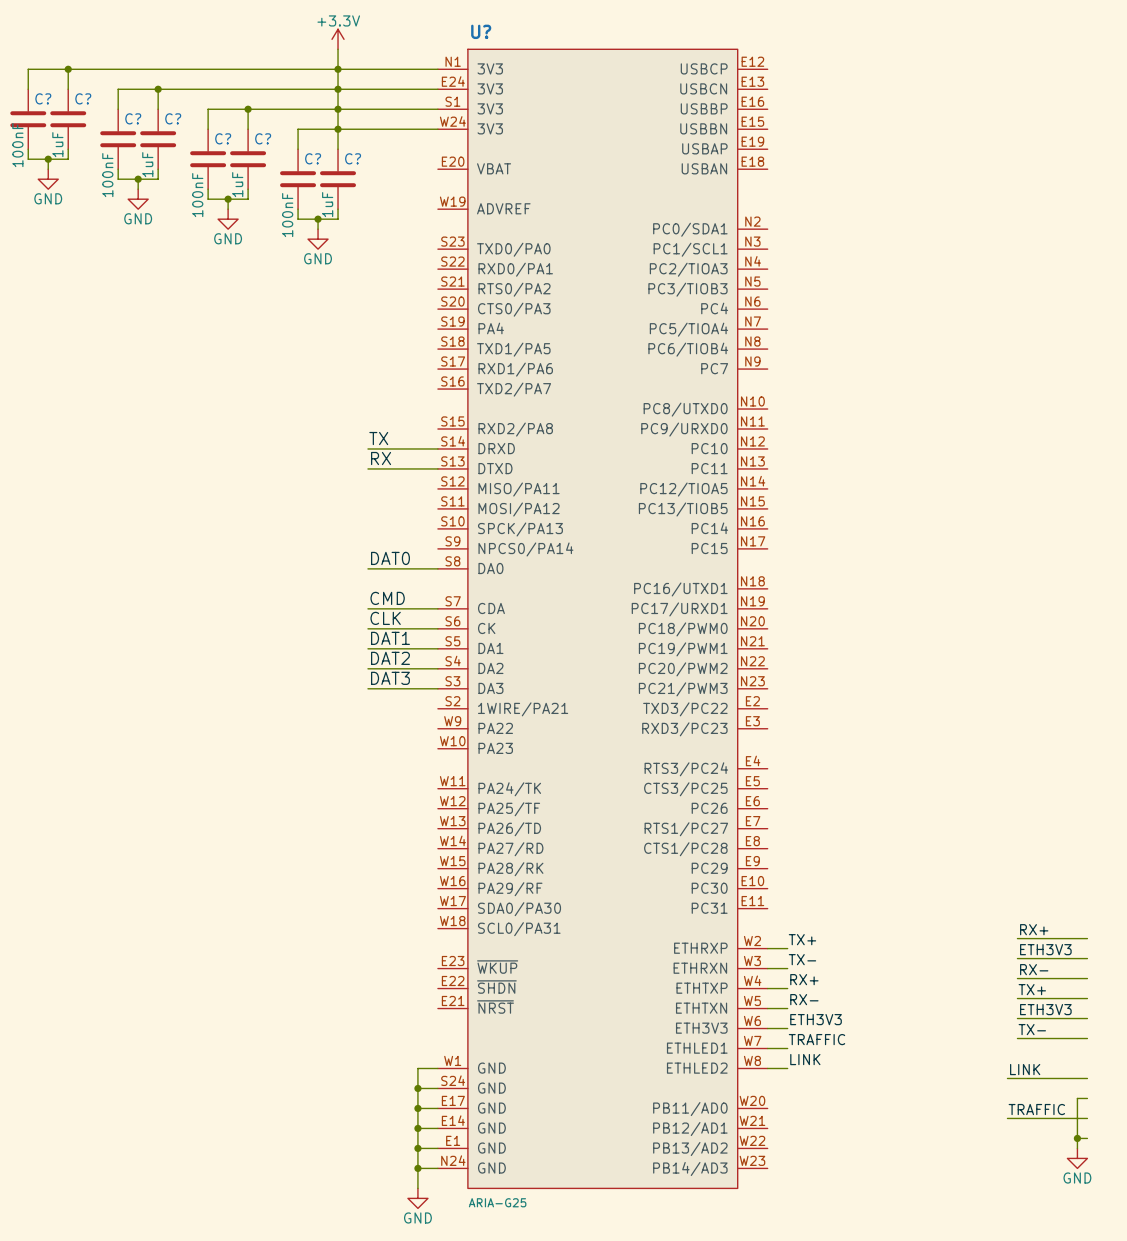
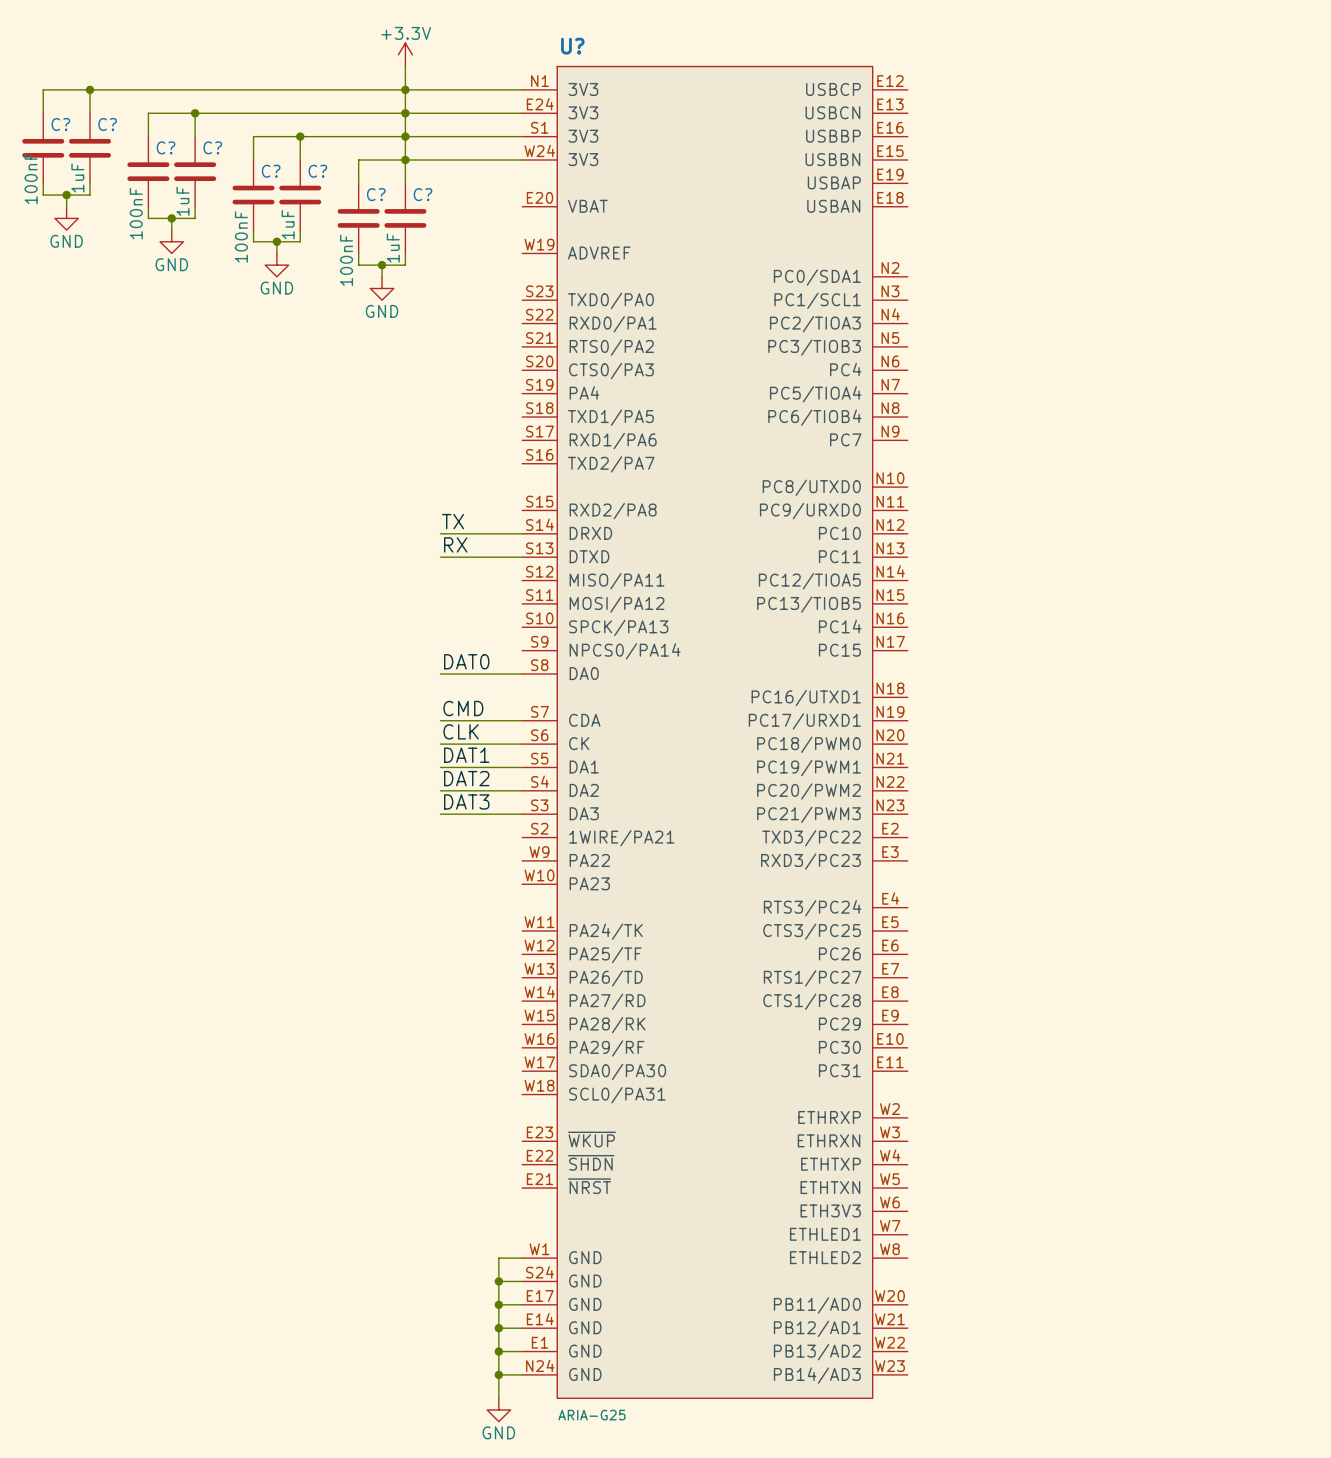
label: RX+ (1034, 929) -> none
wire: (1017, 938) (1087, 938) -> none
label: TX+ (802, 939) -> none
wire: (767, 948) (787, 948) -> none
label: ETH3V3 (1045, 949) -> none
wire: (1017, 958) (1087, 958) -> none
label: TX- (802, 959) -> none
wire: (767, 968) (787, 968) -> none
label: RX- (1034, 969) -> none
wire: (1017, 978) (1087, 978) -> none
label: RX+ (804, 979) -> none
wire: (767, 988) (787, 988) -> none
label: TX+ (1032, 989) -> none
wire: (1017, 998) (1087, 998) -> none
label: RX- (804, 999) -> none
wire: (767, 1008) (787, 1008) -> none
label: ETH3V3 (1045, 1009) -> none
wire: (1017, 1018) (1087, 1018) -> none
label: ETH3V3 (816, 1019) -> none
wire: (767, 1028) (787, 1028) -> none
label: TX- (1032, 1029) -> none
wire: (1017, 1038) (1087, 1038) -> none
label: TRAFFIC (816, 1039) -> none
wire: (767, 1048) (787, 1048) -> none
label: LINK (805, 1059) -> none
wire: (767, 1068) (787, 1068) -> none
label: LINK (1025, 1069) -> none
wire: (1007, 1078) (1087, 1078) -> none
wire: (1087, 1098) (1077, 1098) (1077, 1148) -> none
label: TRAFFIC (1036, 1109) -> none
wire: (1007, 1118) (1087, 1118) -> none
wire: (1077, 1138) (1087, 1138) -> none
junction: (1077, 1138) -> none
power symbol: GND (1077, 1158) -> none

